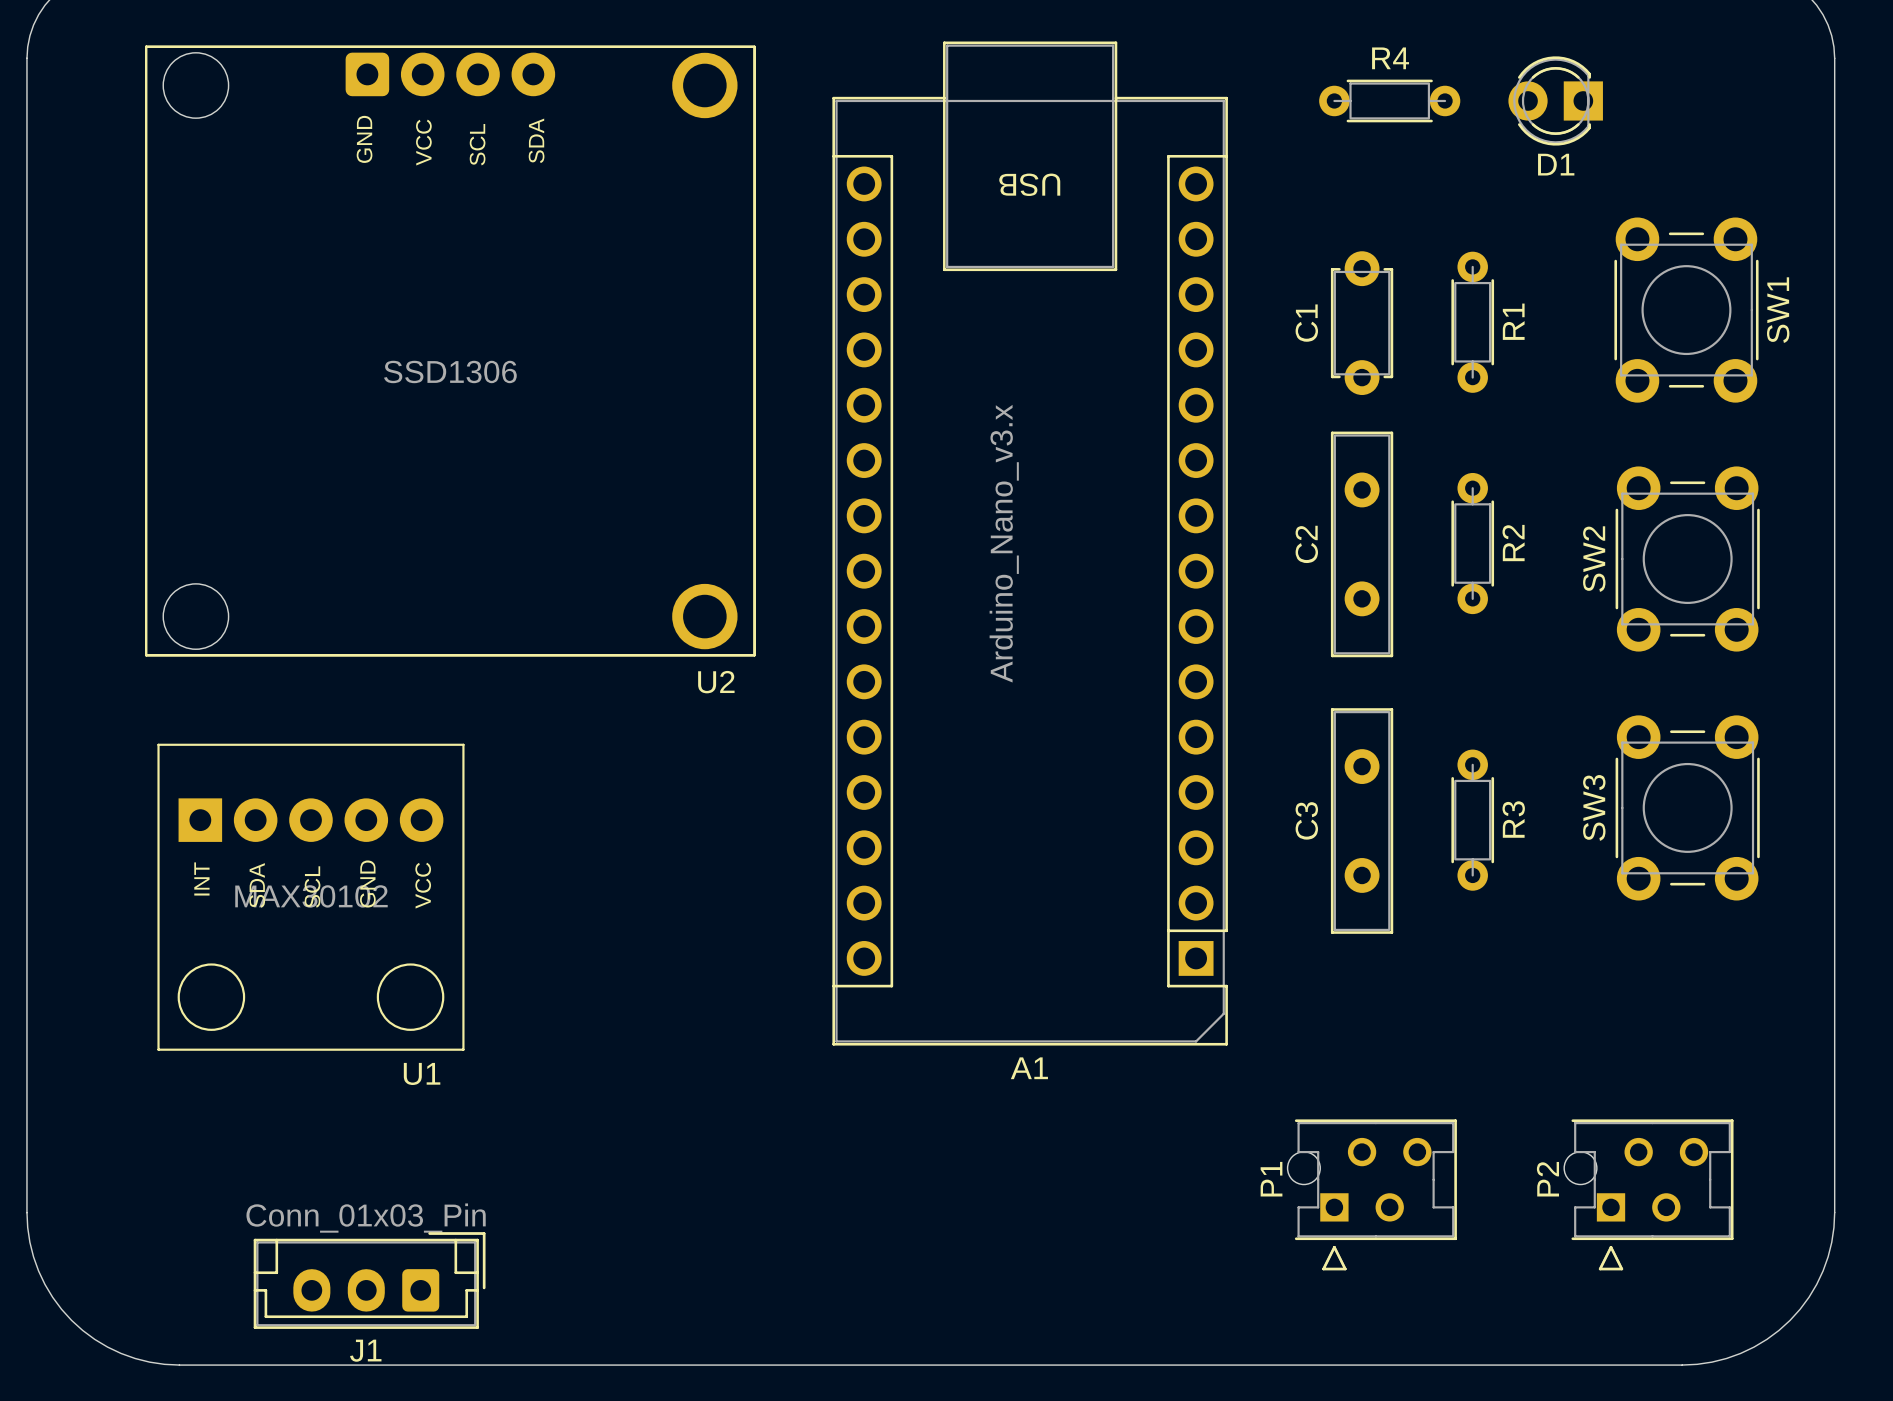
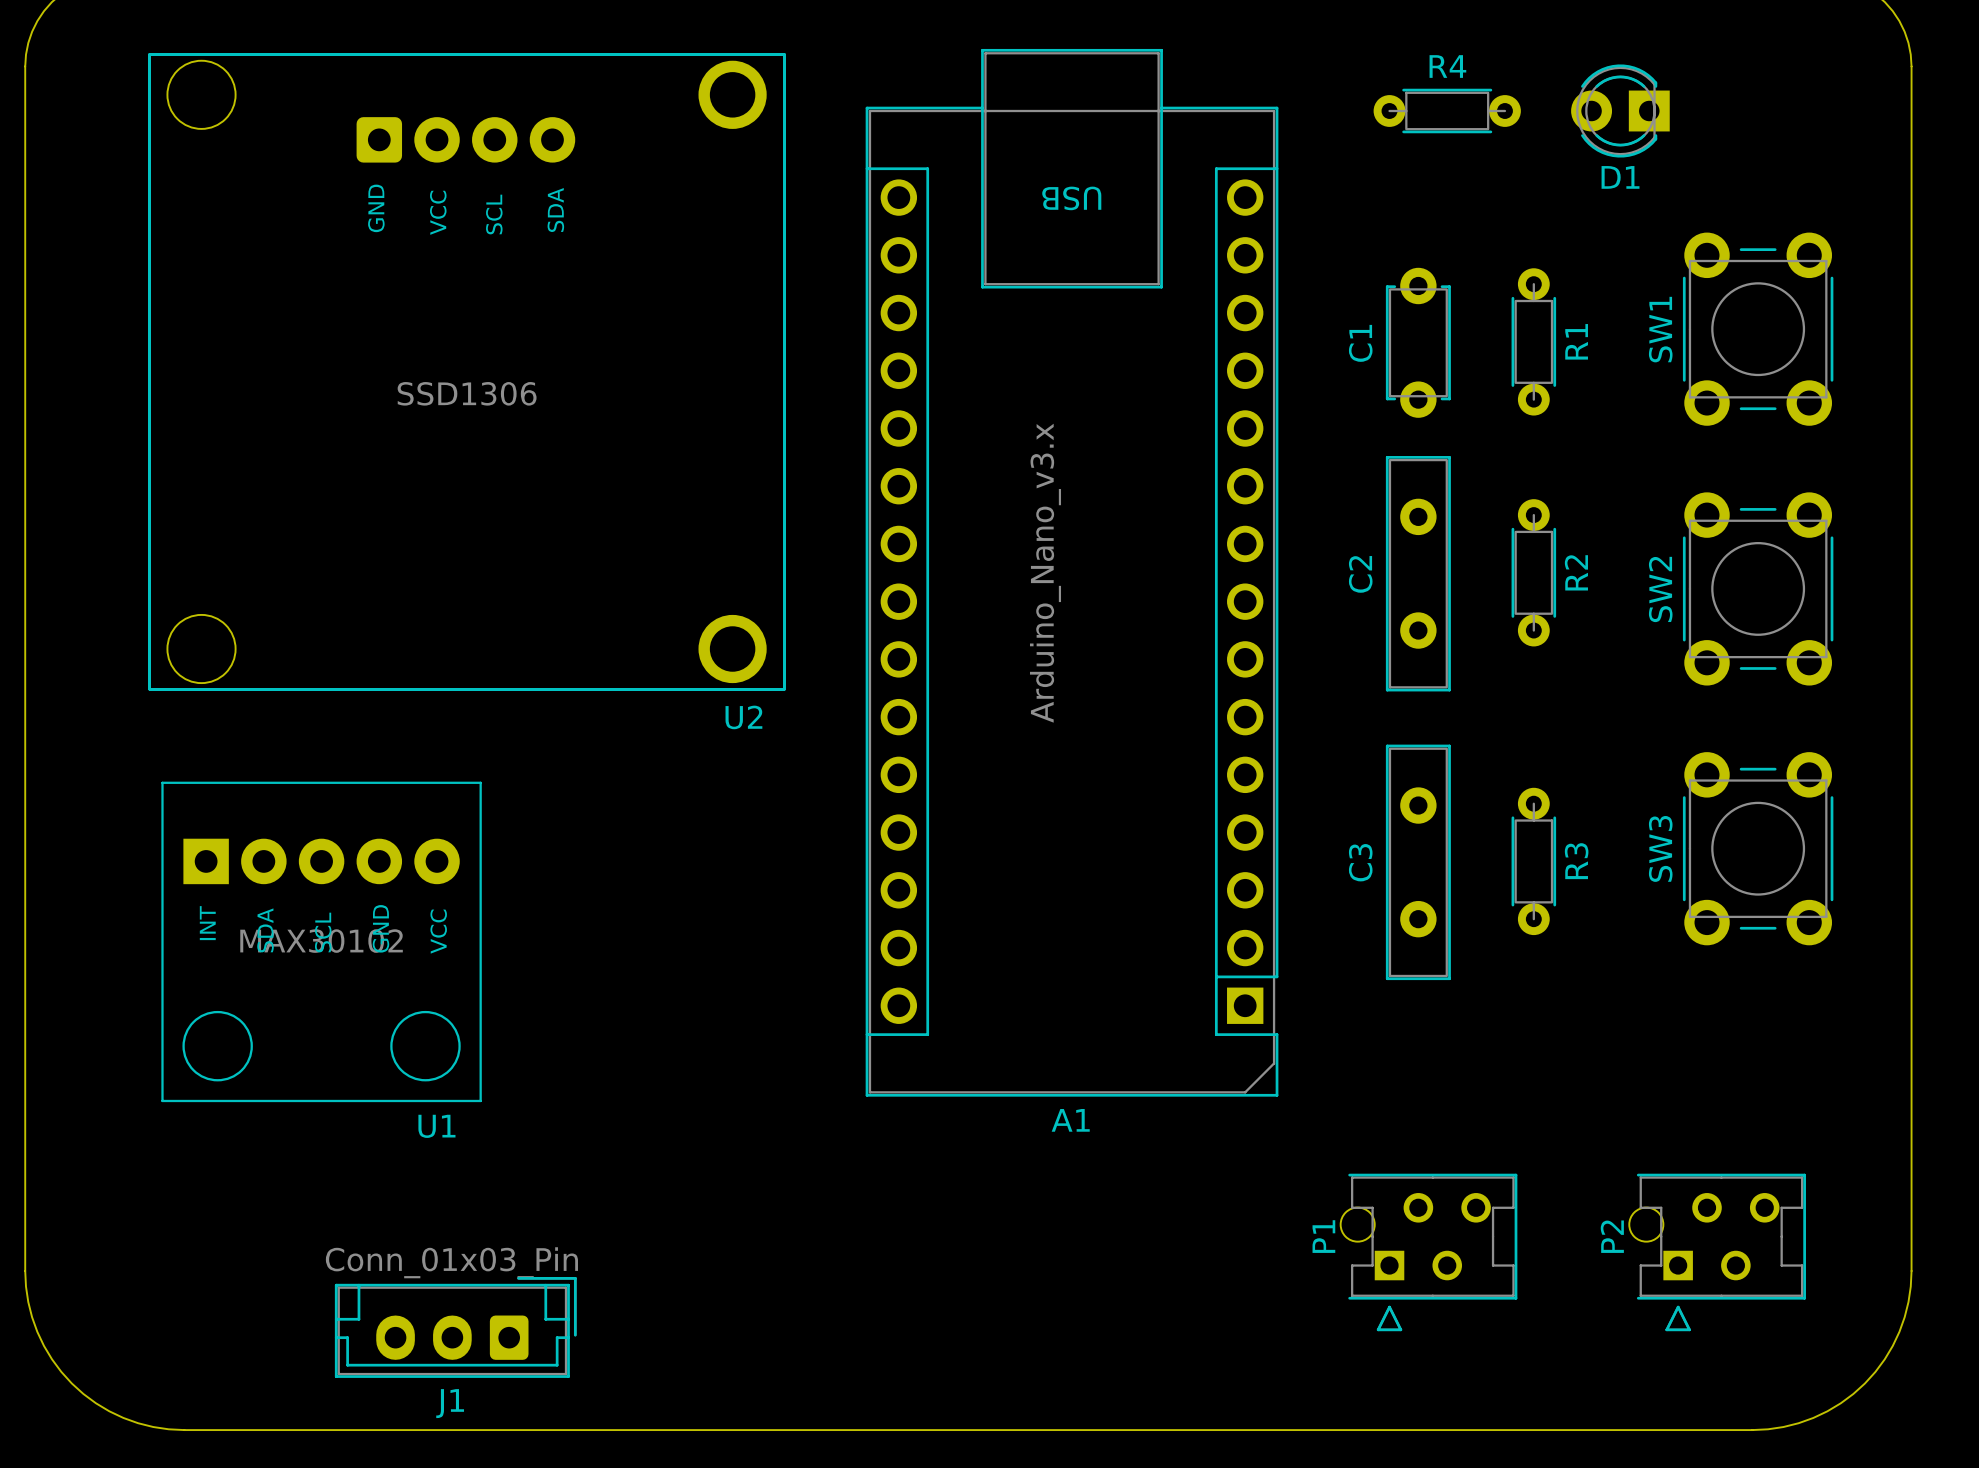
U2 footprint: [145, 45, 756, 657] -> [148, 53, 786, 691]
SW1 rotation: 0° (1686, 310) -> 180° (1758, 329)
J1 position: (369, 1280) -> (455, 1327)

